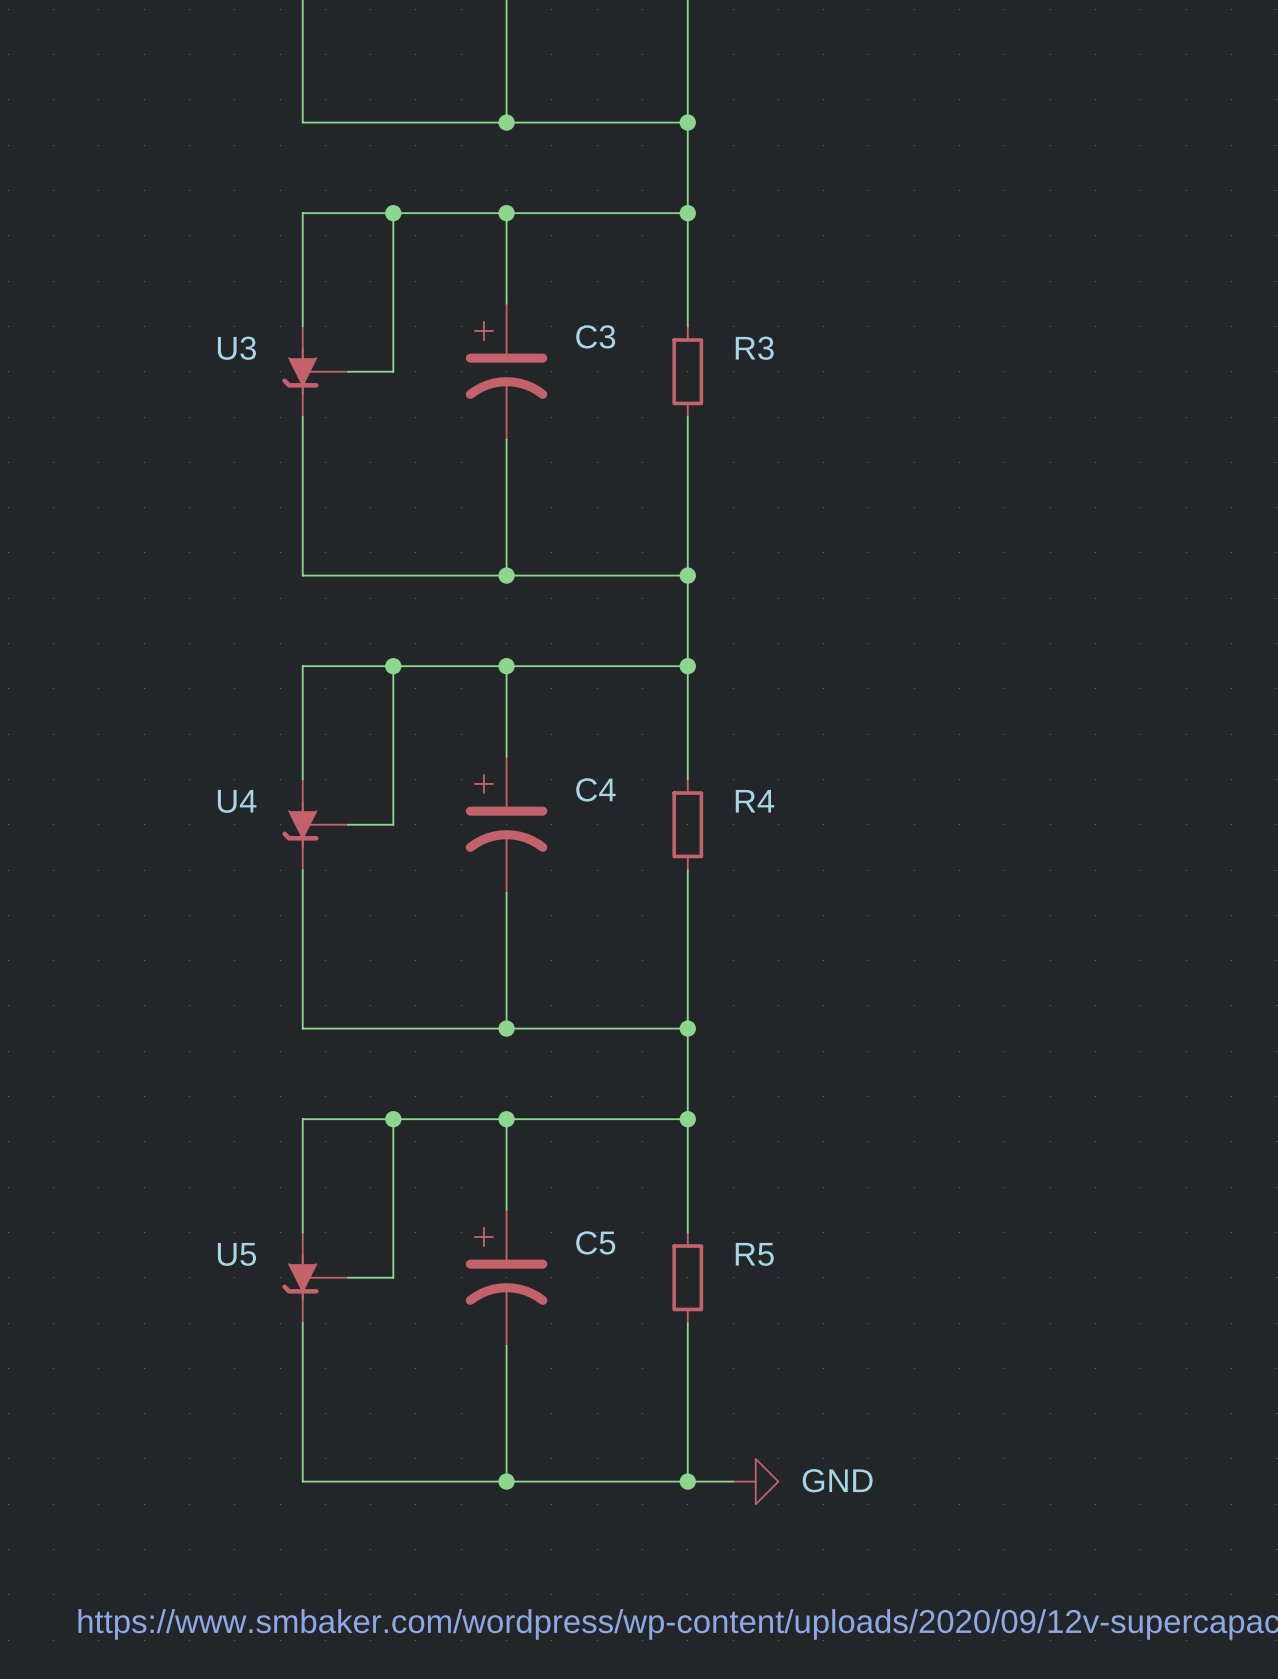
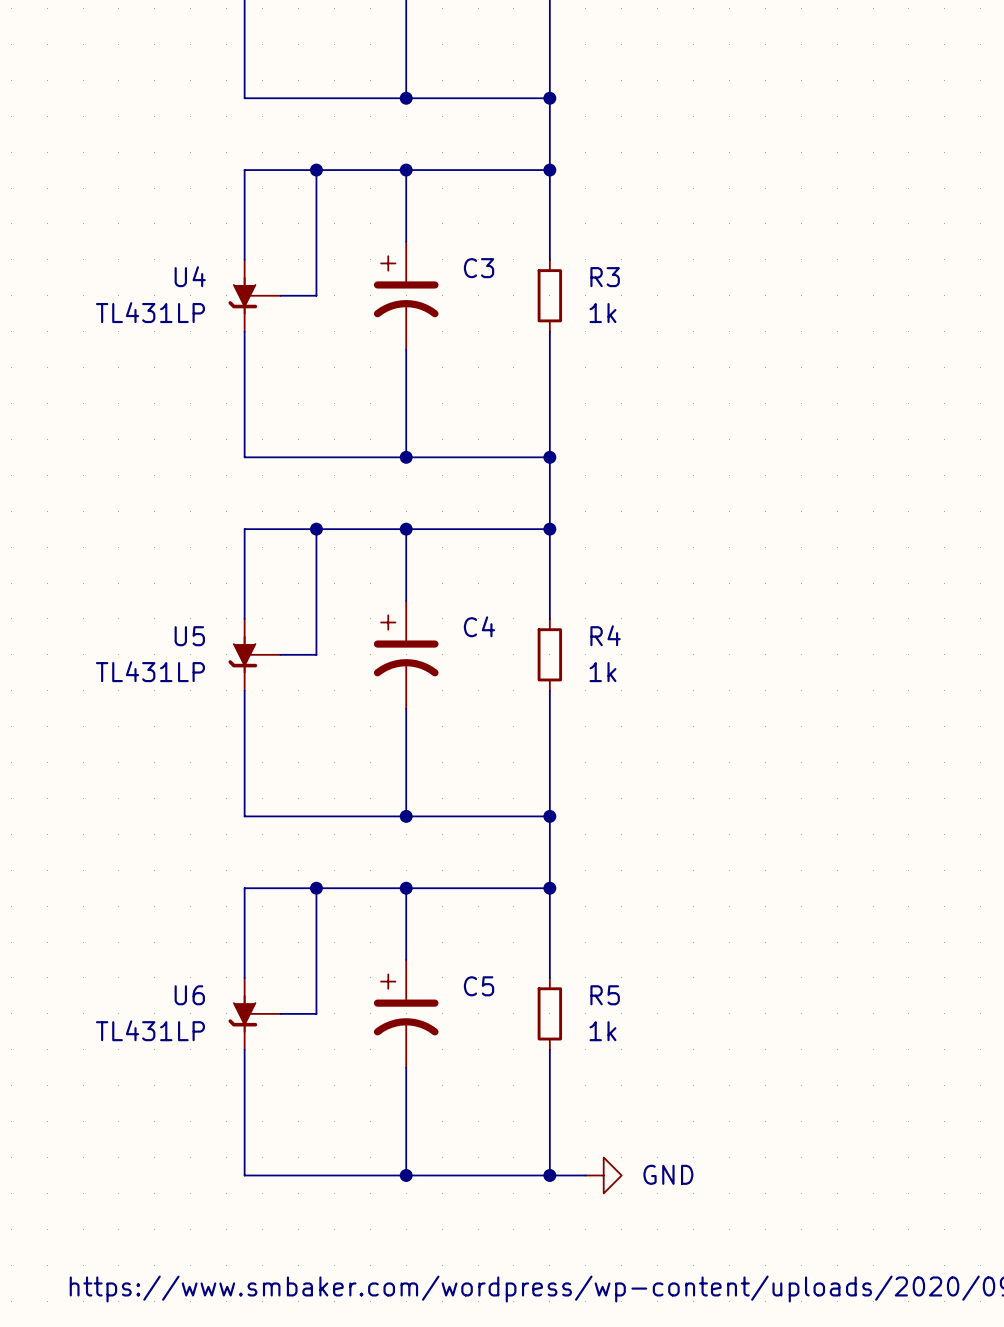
U3 name: U3 (236, 348) -> U4 (190, 276)
R3 value: none -> 1k (602, 313)
U3 value: none -> TL431LP (150, 312)
U4 name: U4 (237, 801) -> U5 (189, 636)
R4 value: none -> 1k (602, 672)
U4 value: none -> TL431LP (150, 671)
U5 name: U5 (236, 1254) -> U6 (189, 995)
R5 value: none -> 1k (602, 1031)
U5 value: none -> TL431LP (150, 1030)

